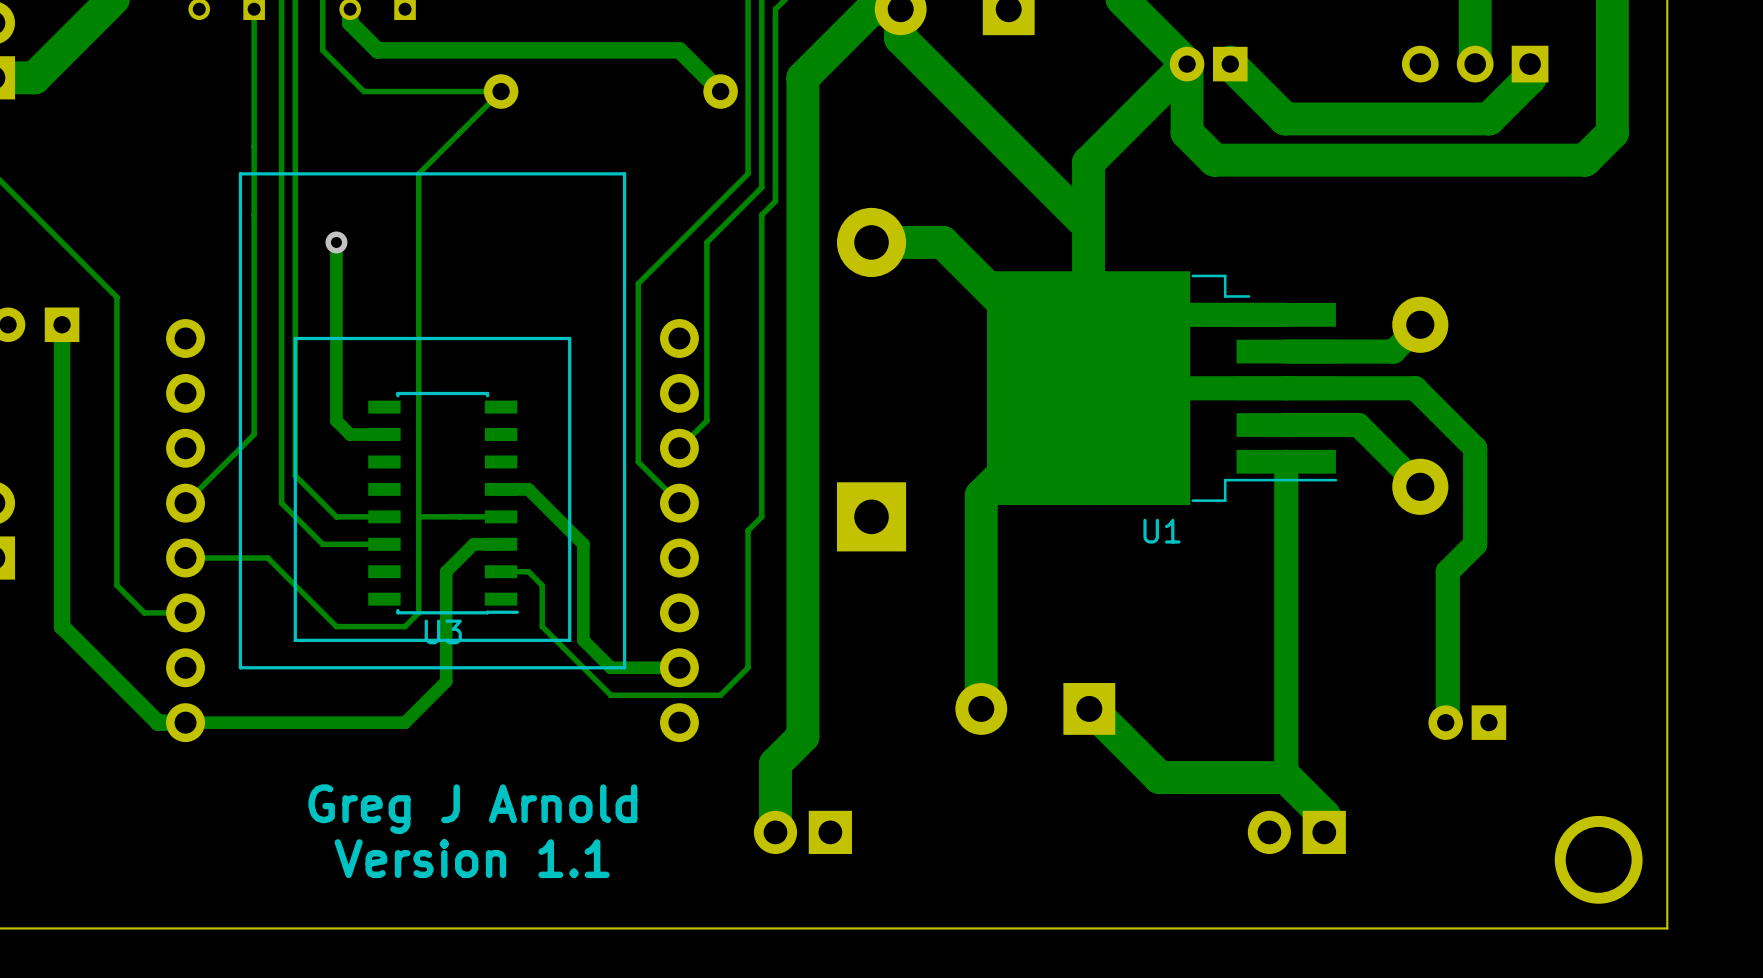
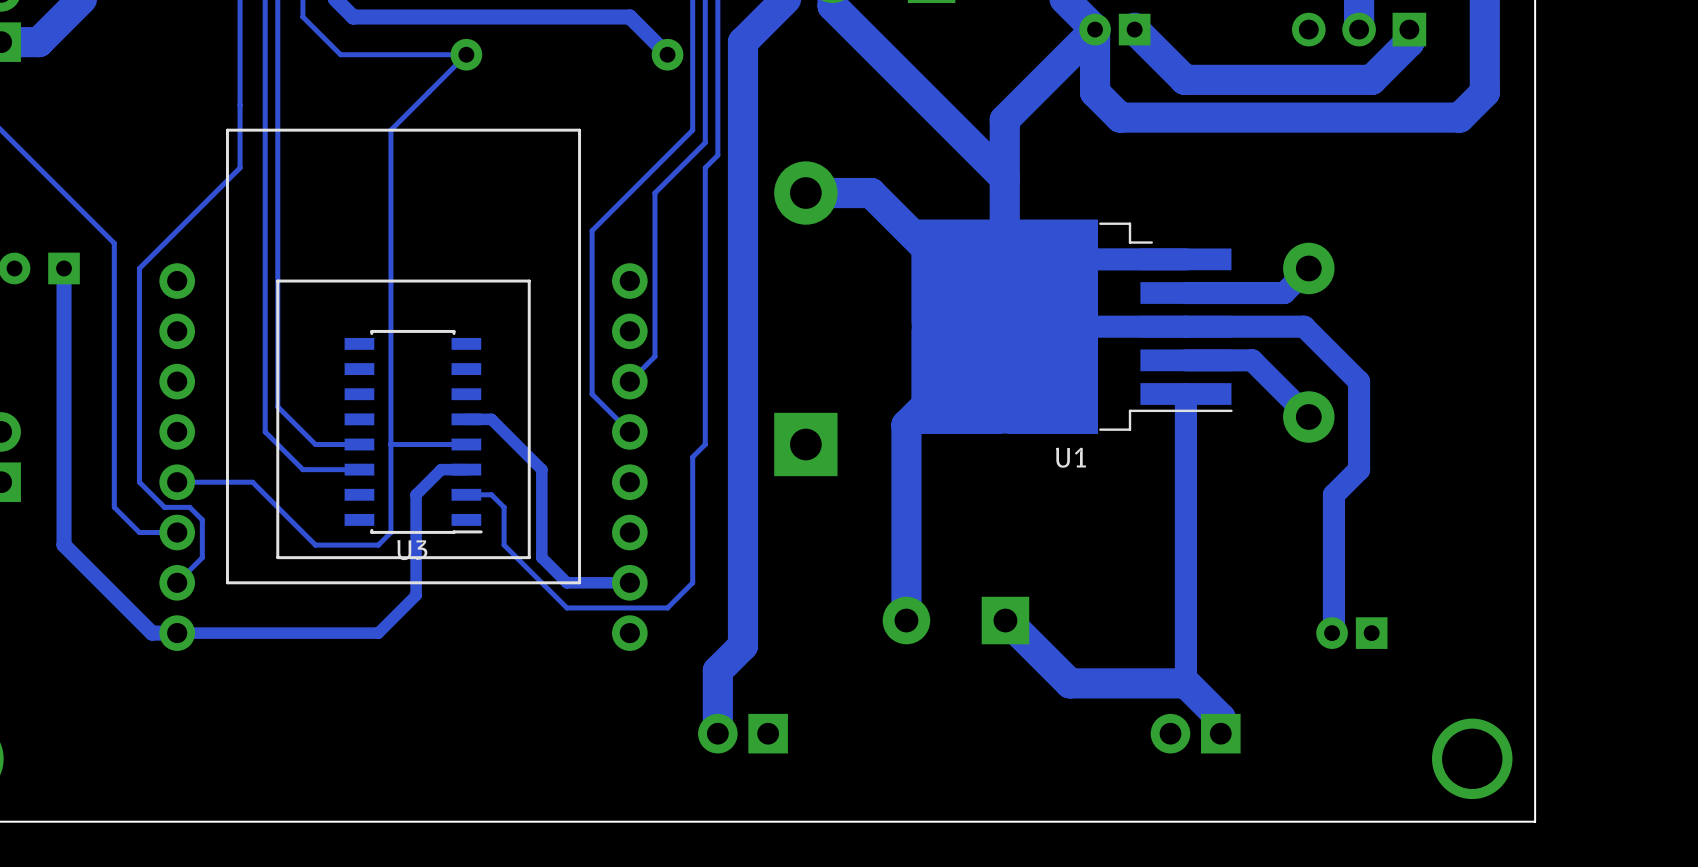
track: (254, 215) (254, 434) (185, 503) -> (240, 167) (139, 268) (139, 482) (164, 507) (189, 507) (202, 519) (202, 557) (177, 582)
track: (336, 242) (336, 420) (350, 434) (384, 434) -> none
via: (336, 242) -> none
text: Greg J Arnold (472, 809) -> none
text: Version 1.1 (472, 858) -> none

